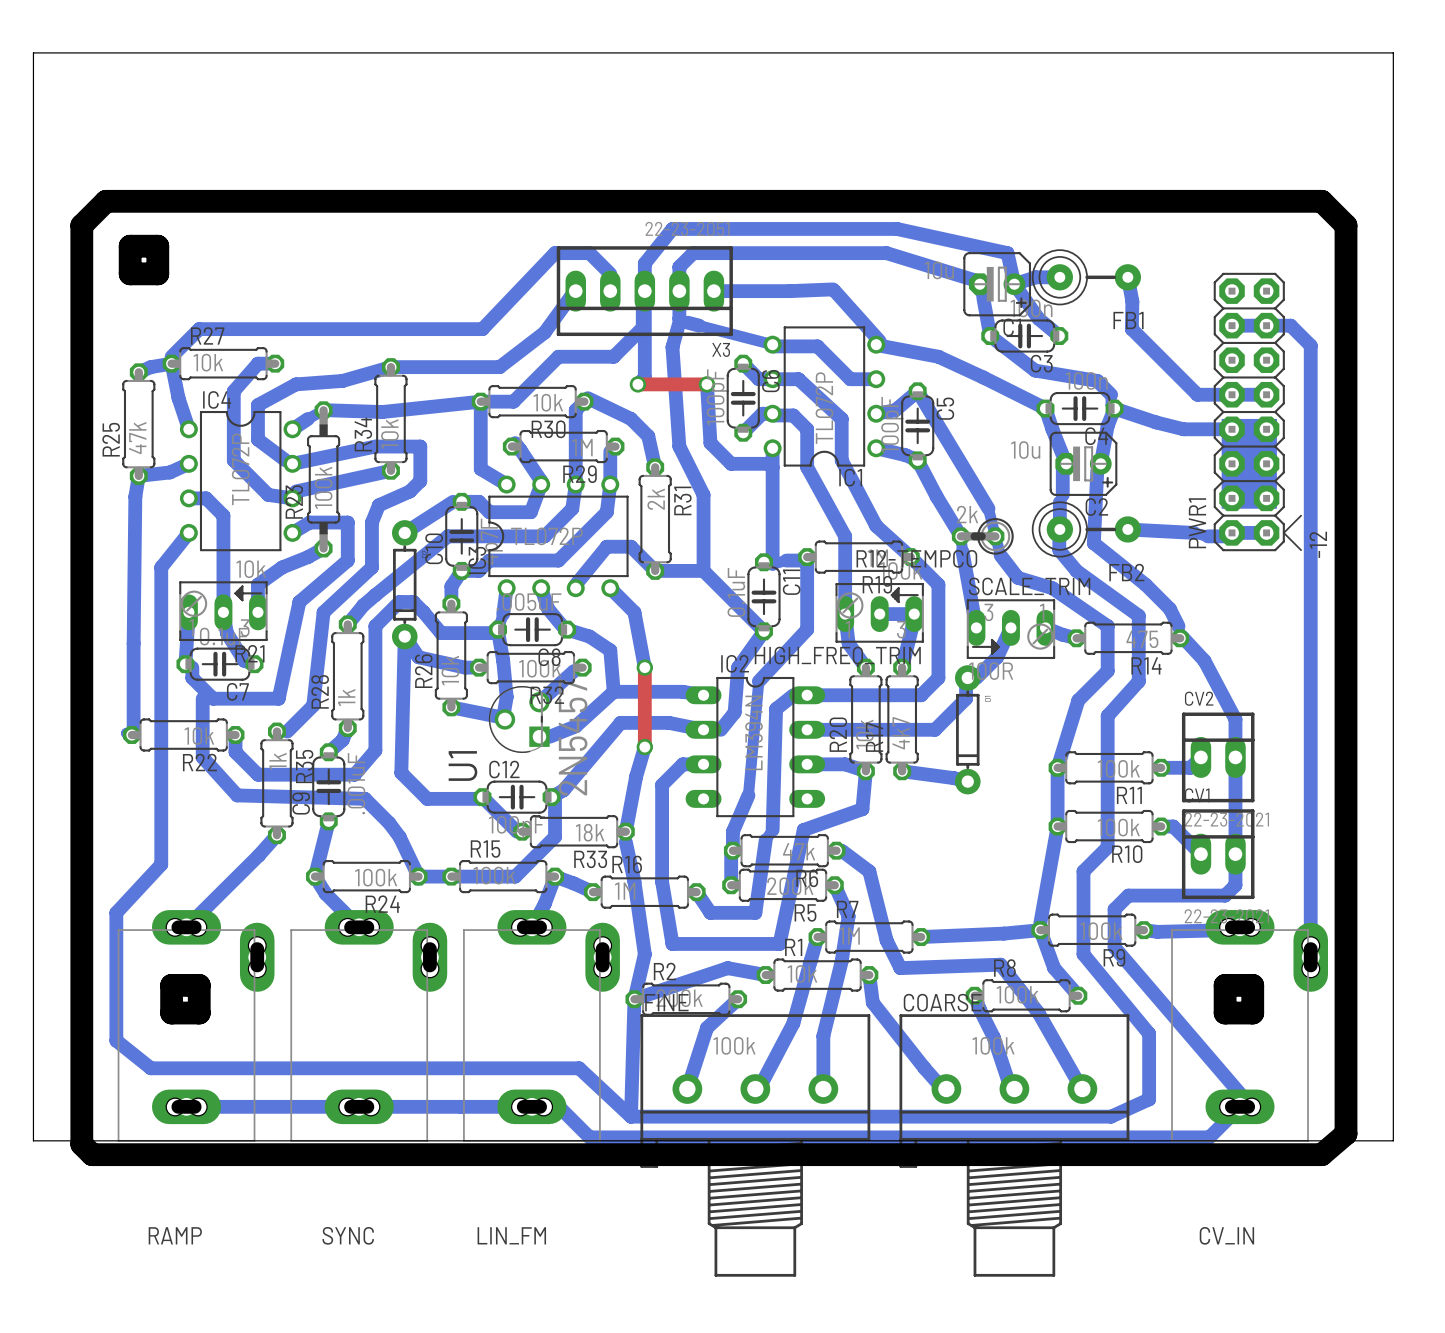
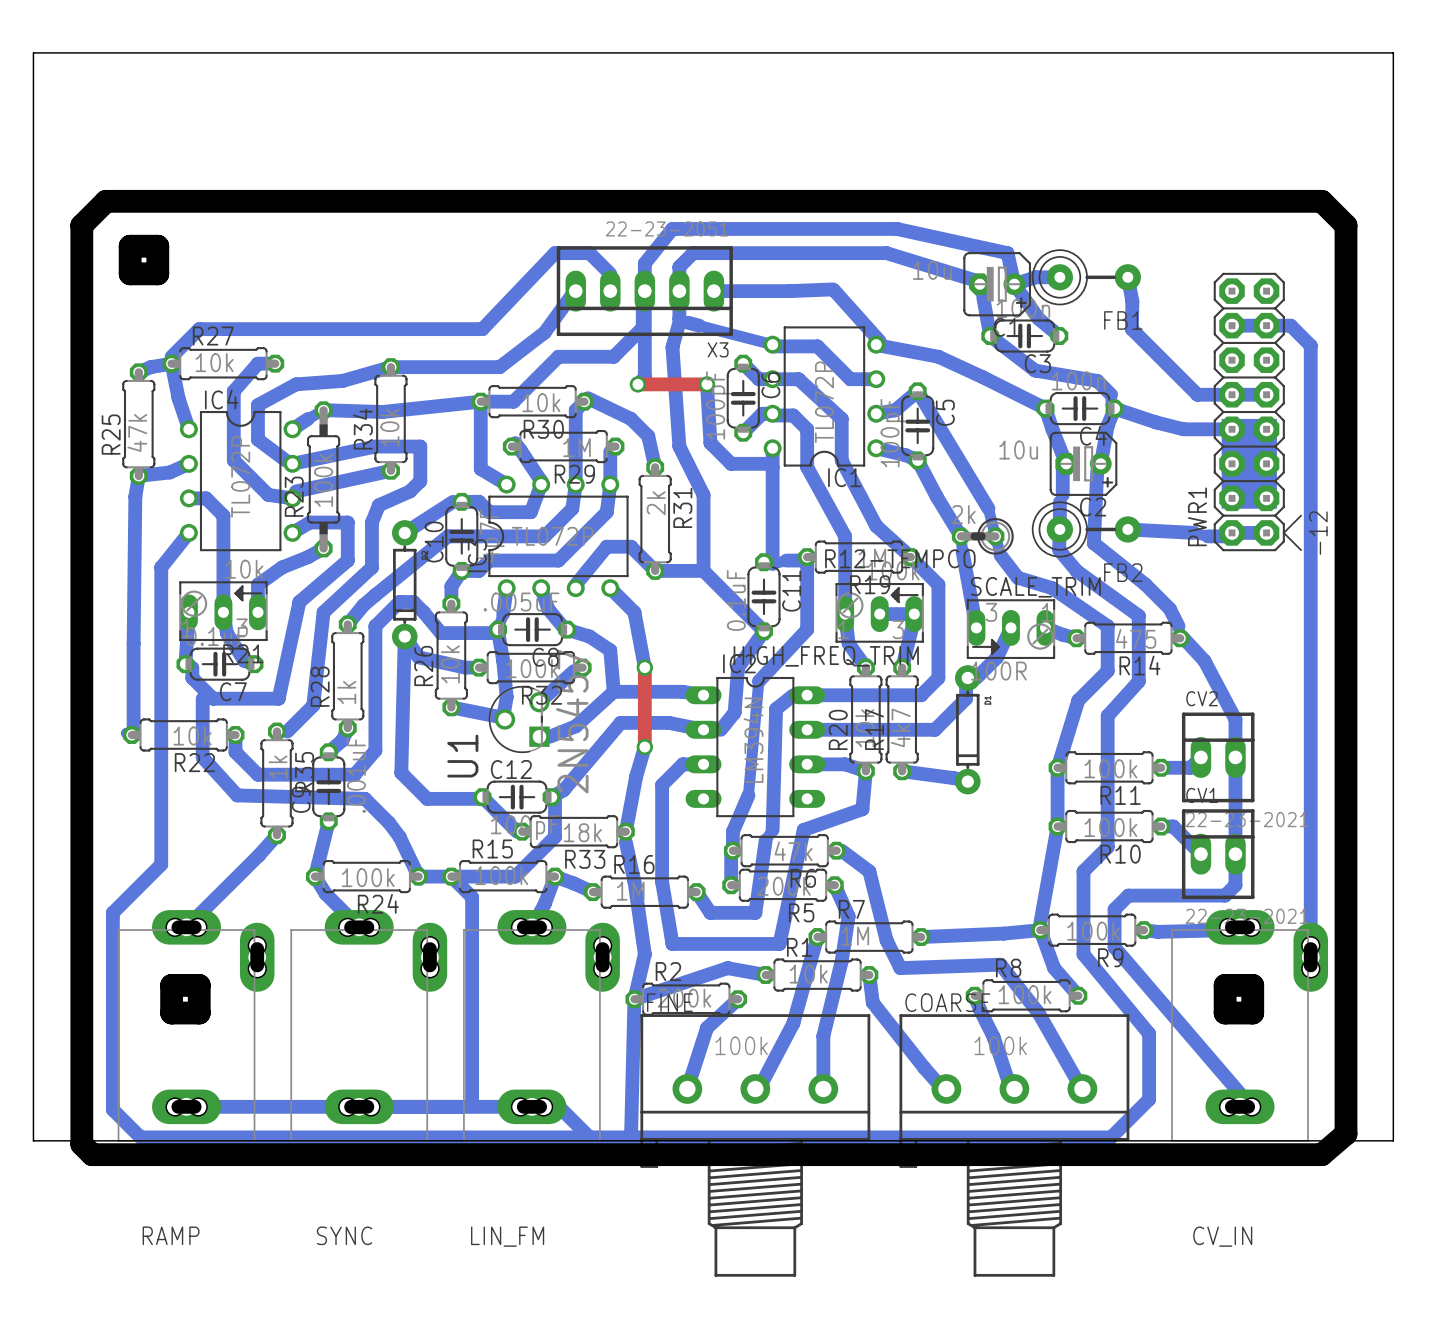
bottom track: (161, 864) (116, 912) (116, 1040) (150, 1068) (579, 1068) (631, 1116) -> (161, 864) (112, 912) (112, 1109) (140, 1137) (589, 1137)
bottom track: none -> (451, 876) (472, 897) (472, 1106)
bottom track: (634, 999) (631, 1116) -> (634, 999) (631, 1137)
bottom track: (1149, 1099) (1111, 1116) (631, 1116) -> none
bottom track: (1240, 1106) (1209, 1137) (1111, 1137) -> (1149, 1099) (1111, 1137)

